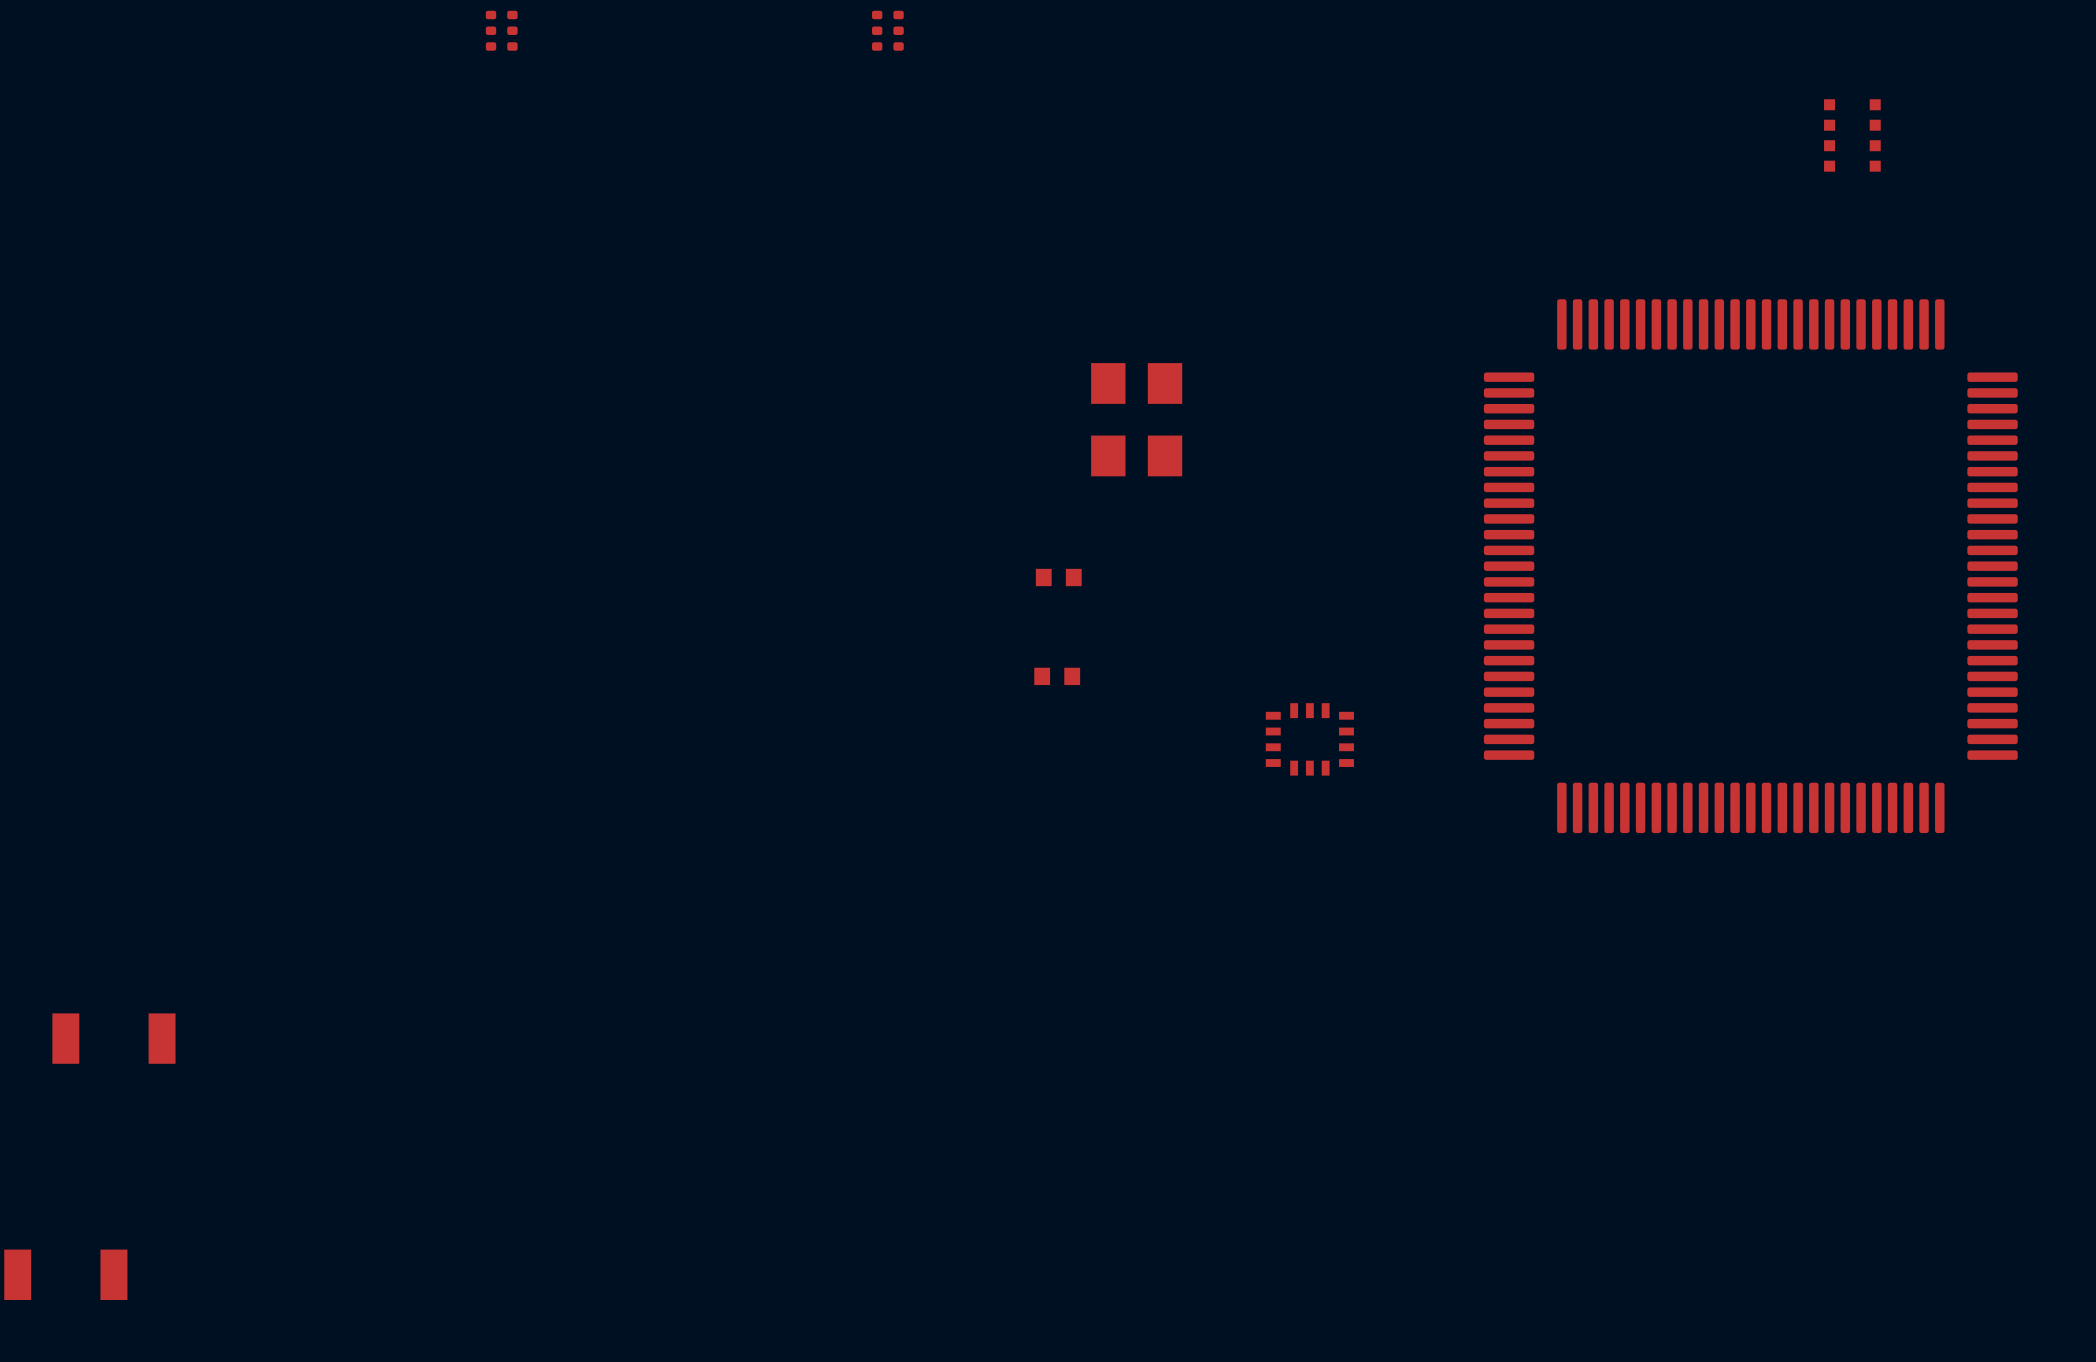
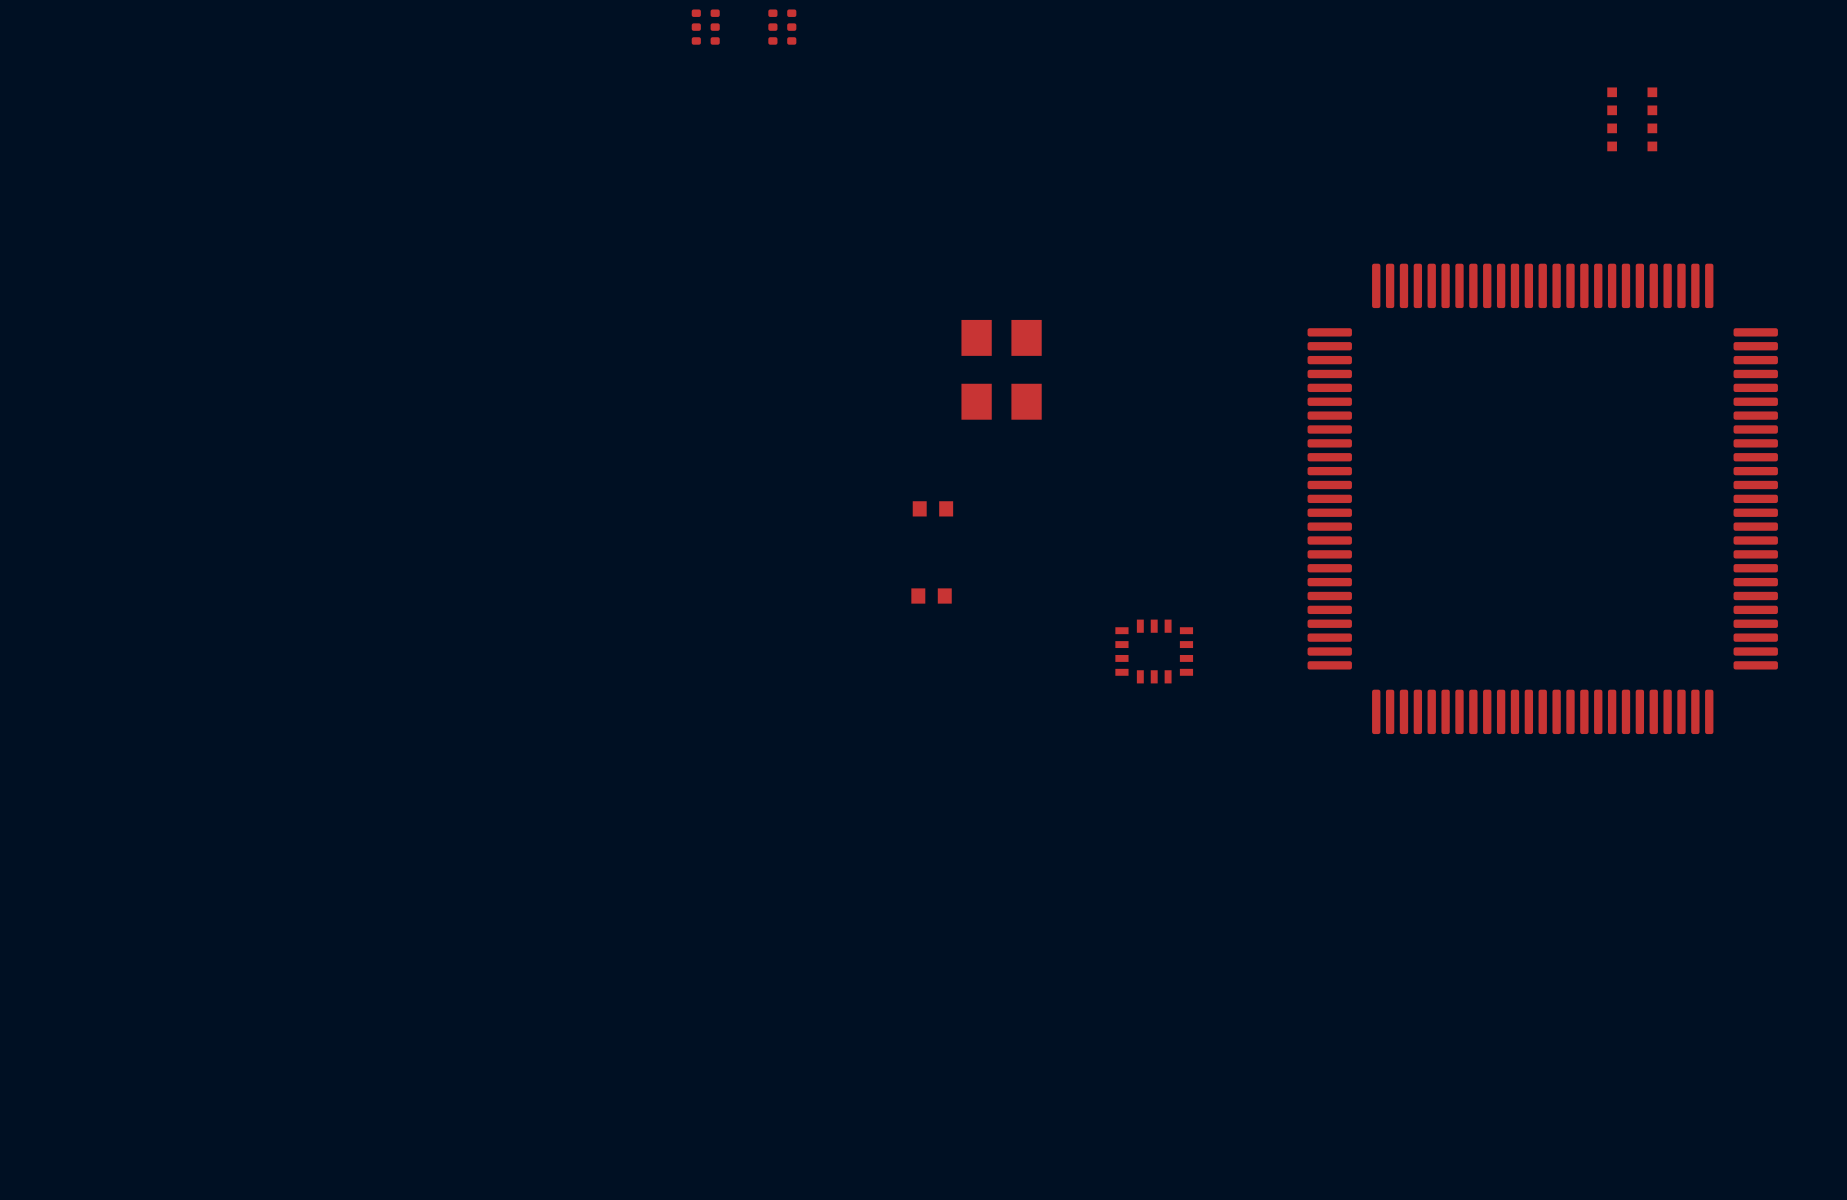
part position: (501, 30) -> (705, 27)
part: (113, 1038) -> none
part: (65, 1274) -> none

